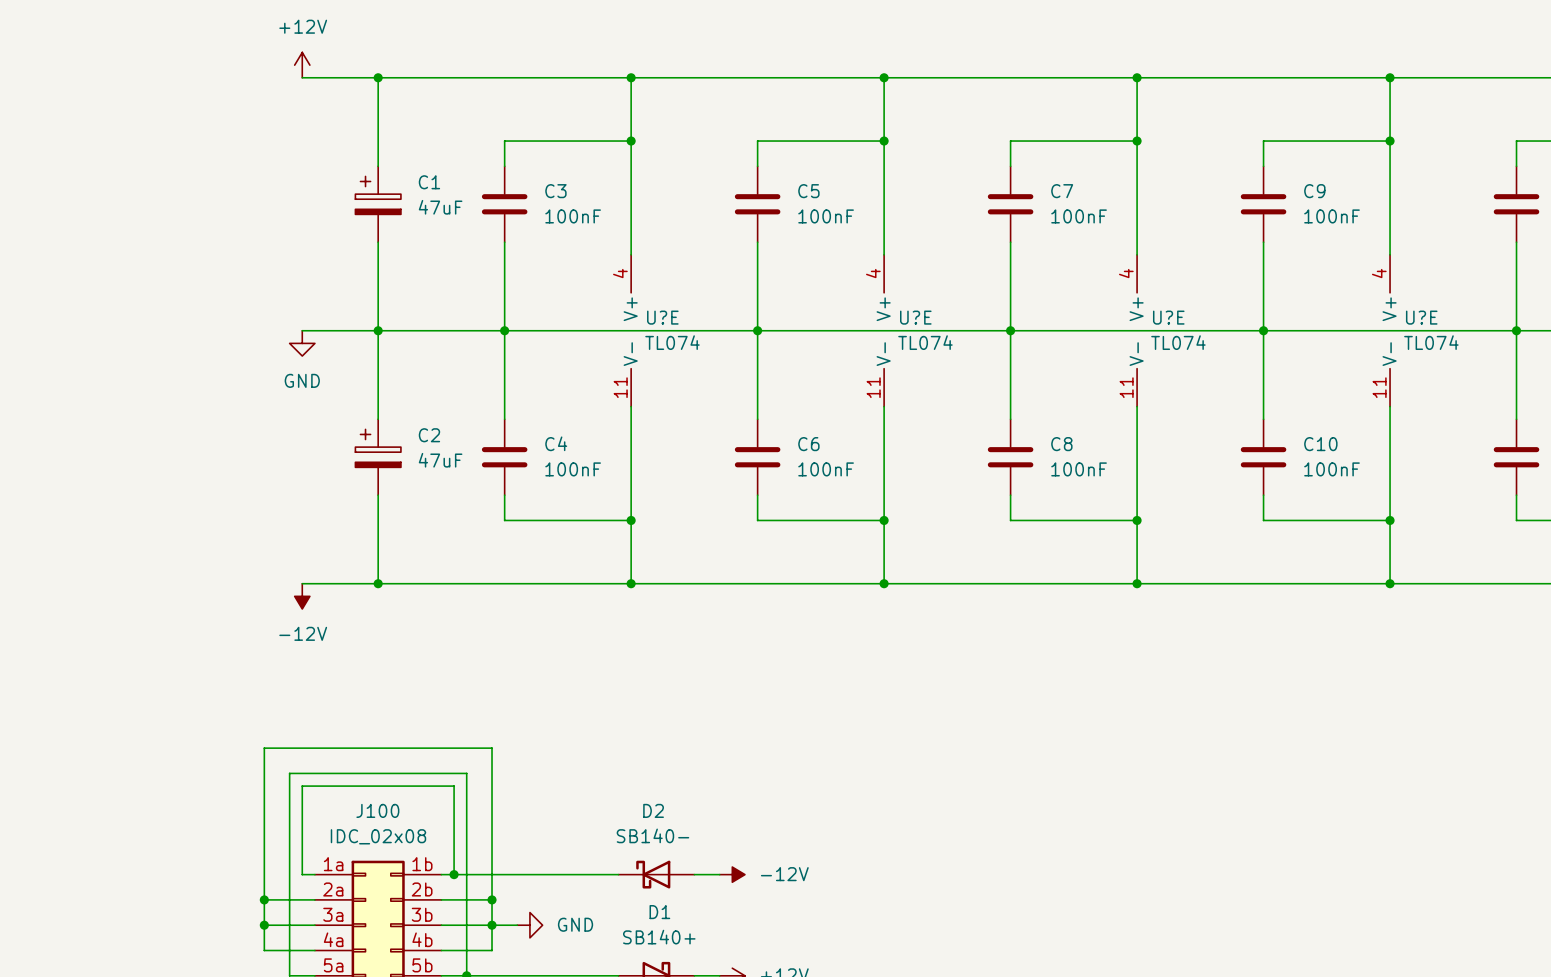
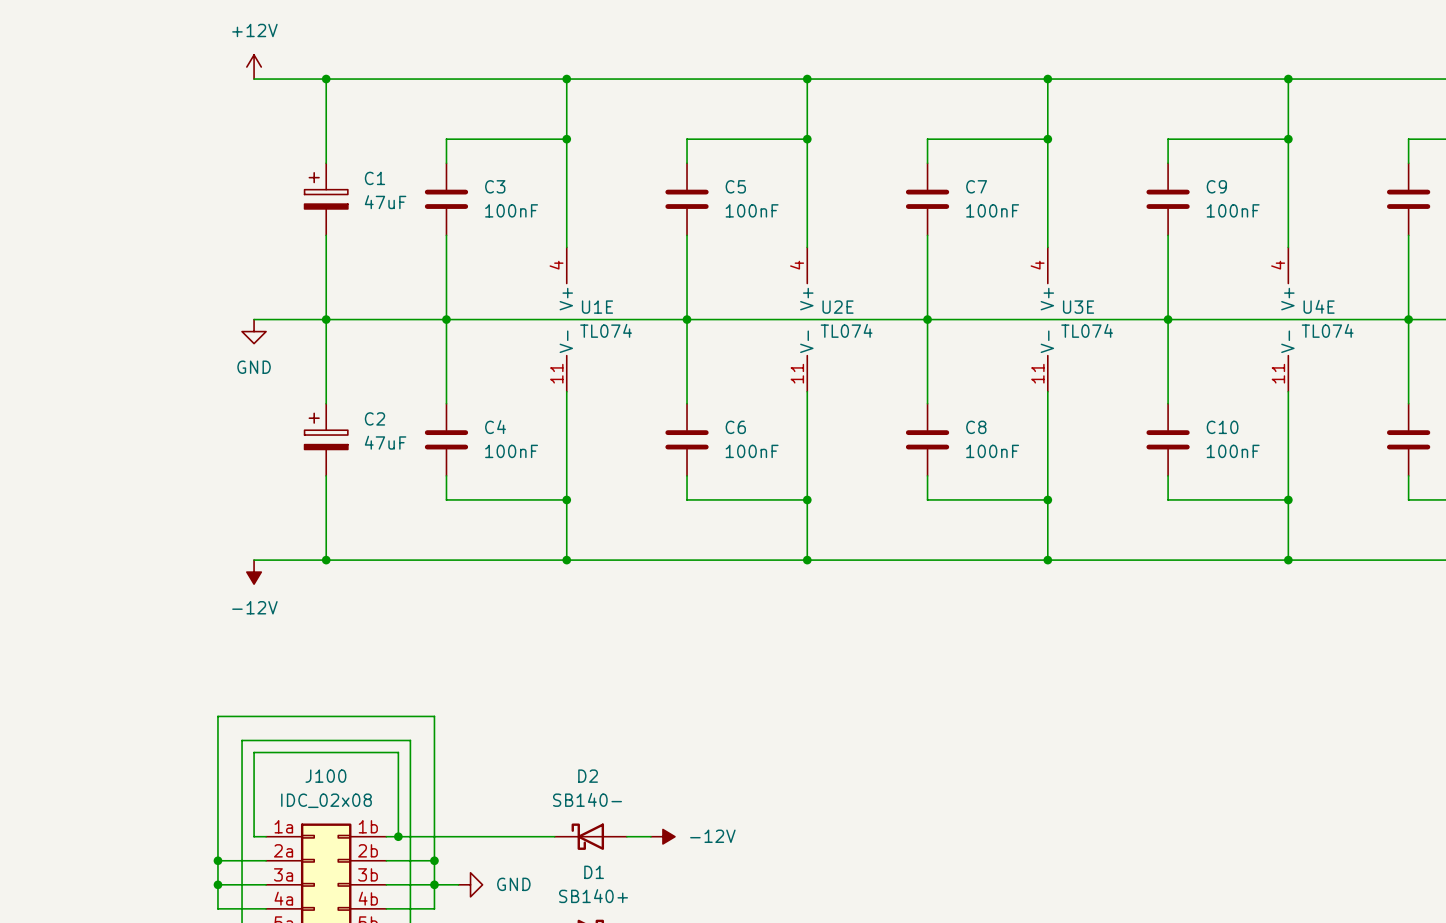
U?E name: U?E (662, 317) -> U1E (597, 307)
U?E name: U?E (915, 317) -> U2E (838, 307)
U?E name: U?E (1168, 317) -> U3E (1078, 307)
U?E name: U?E (1421, 317) -> U4E (1319, 306)

